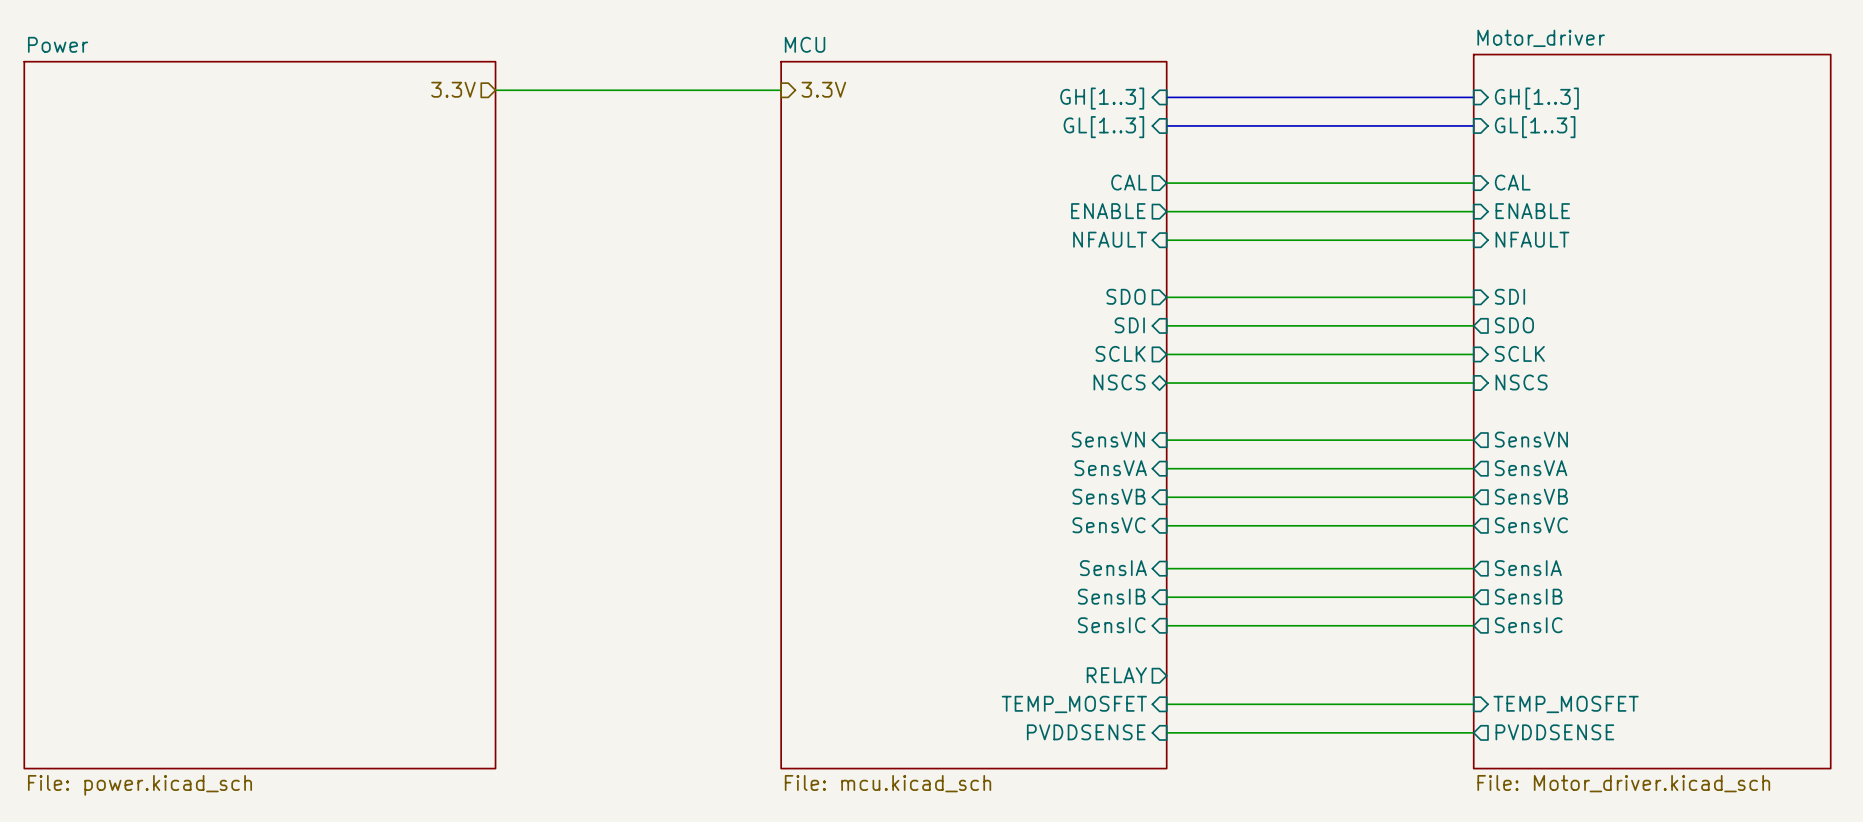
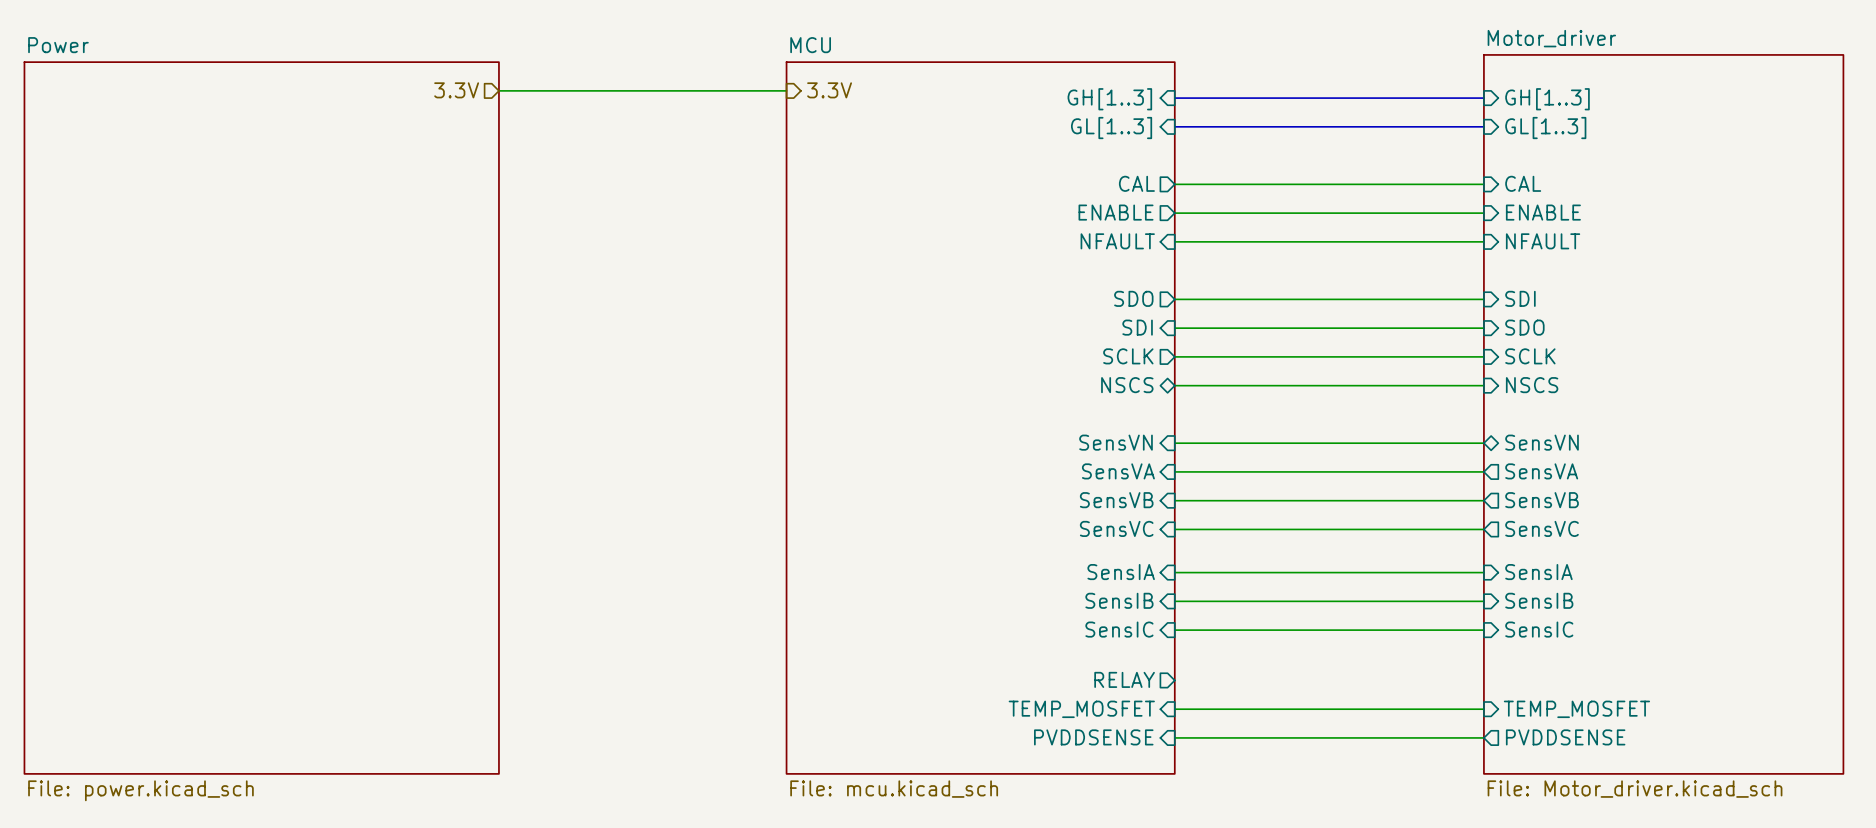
sheet pin shape: output (1514, 325) -> input (1524, 327)
sheet pin shape: output (1531, 439) -> bidirectional (1542, 442)
sheet pin shape: output (1528, 568) -> input (1538, 572)
sheet pin shape: output (1528, 596) -> input (1539, 600)
sheet pin shape: output (1528, 625) -> input (1539, 629)

